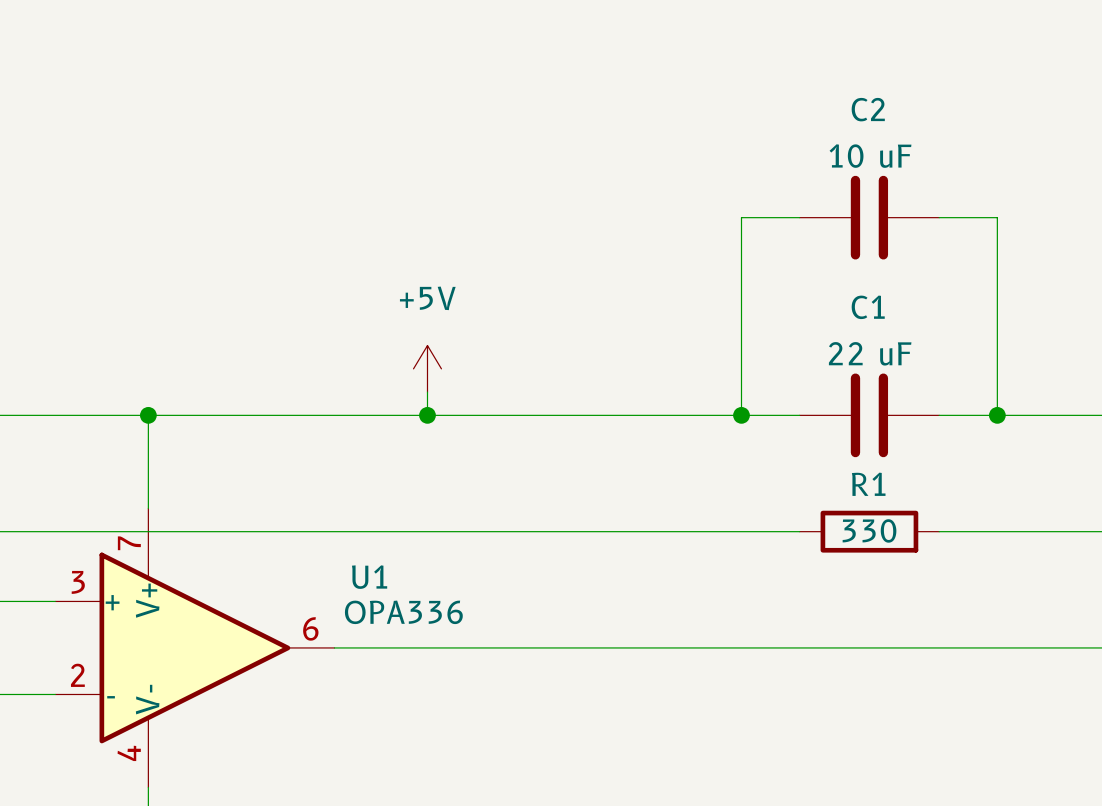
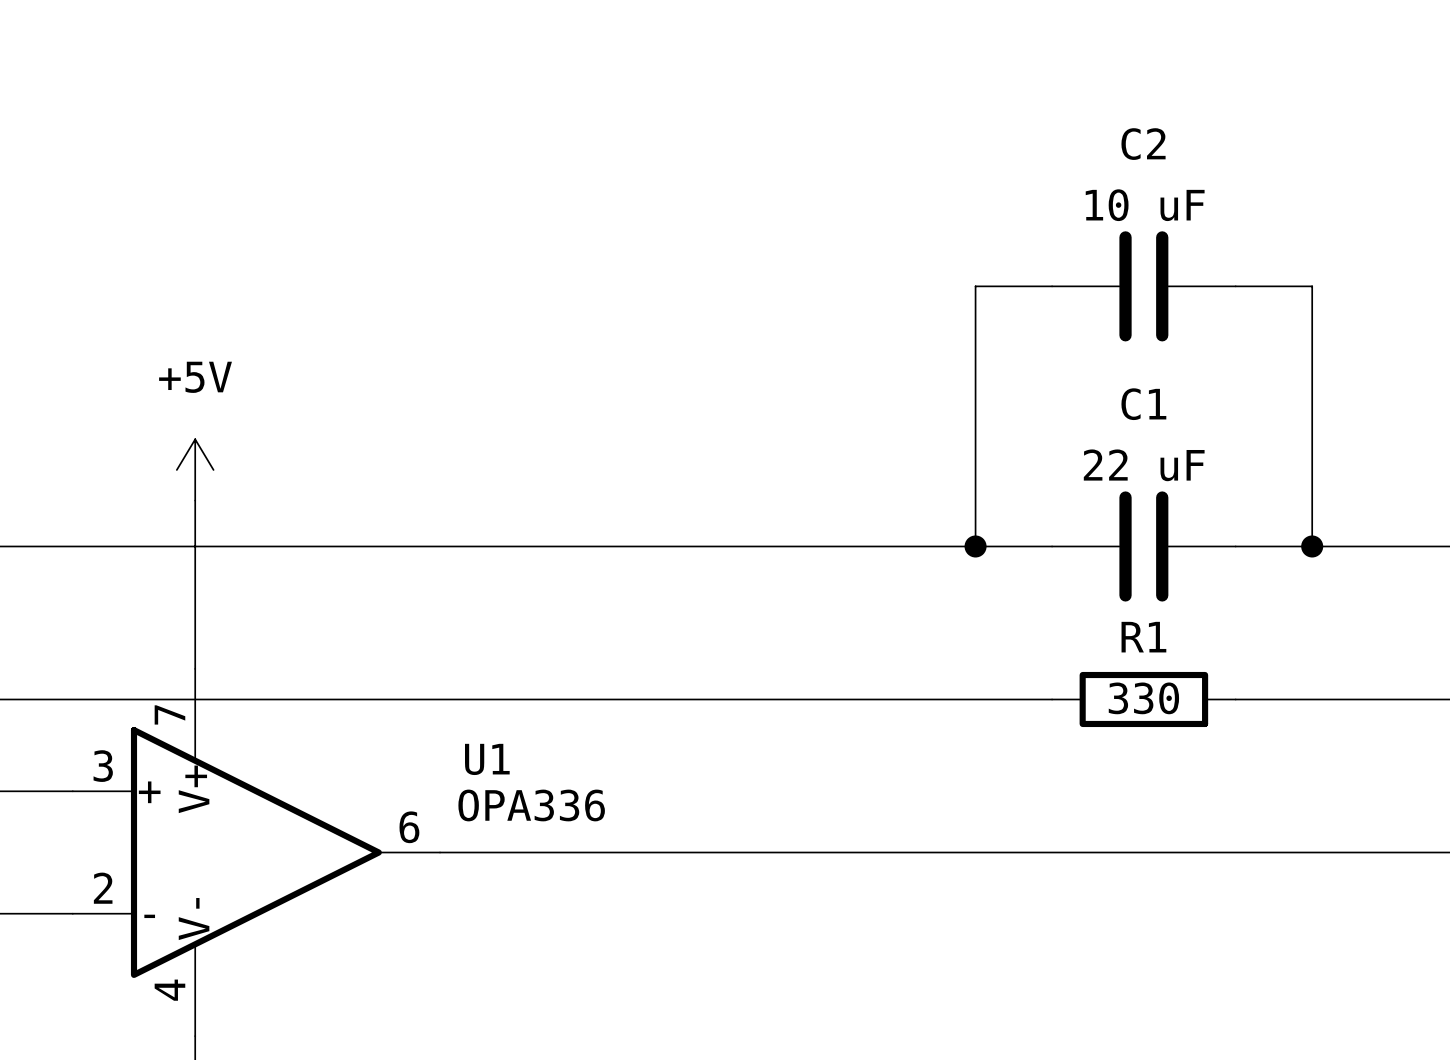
power symbol position: +5V (427, 368) -> +5V (195, 469)
wire: none -> (195, 500) (195, 546)
wire: (427, 392) (427, 415) -> none
junction: (148, 415) -> none
junction: (427, 415) -> none

